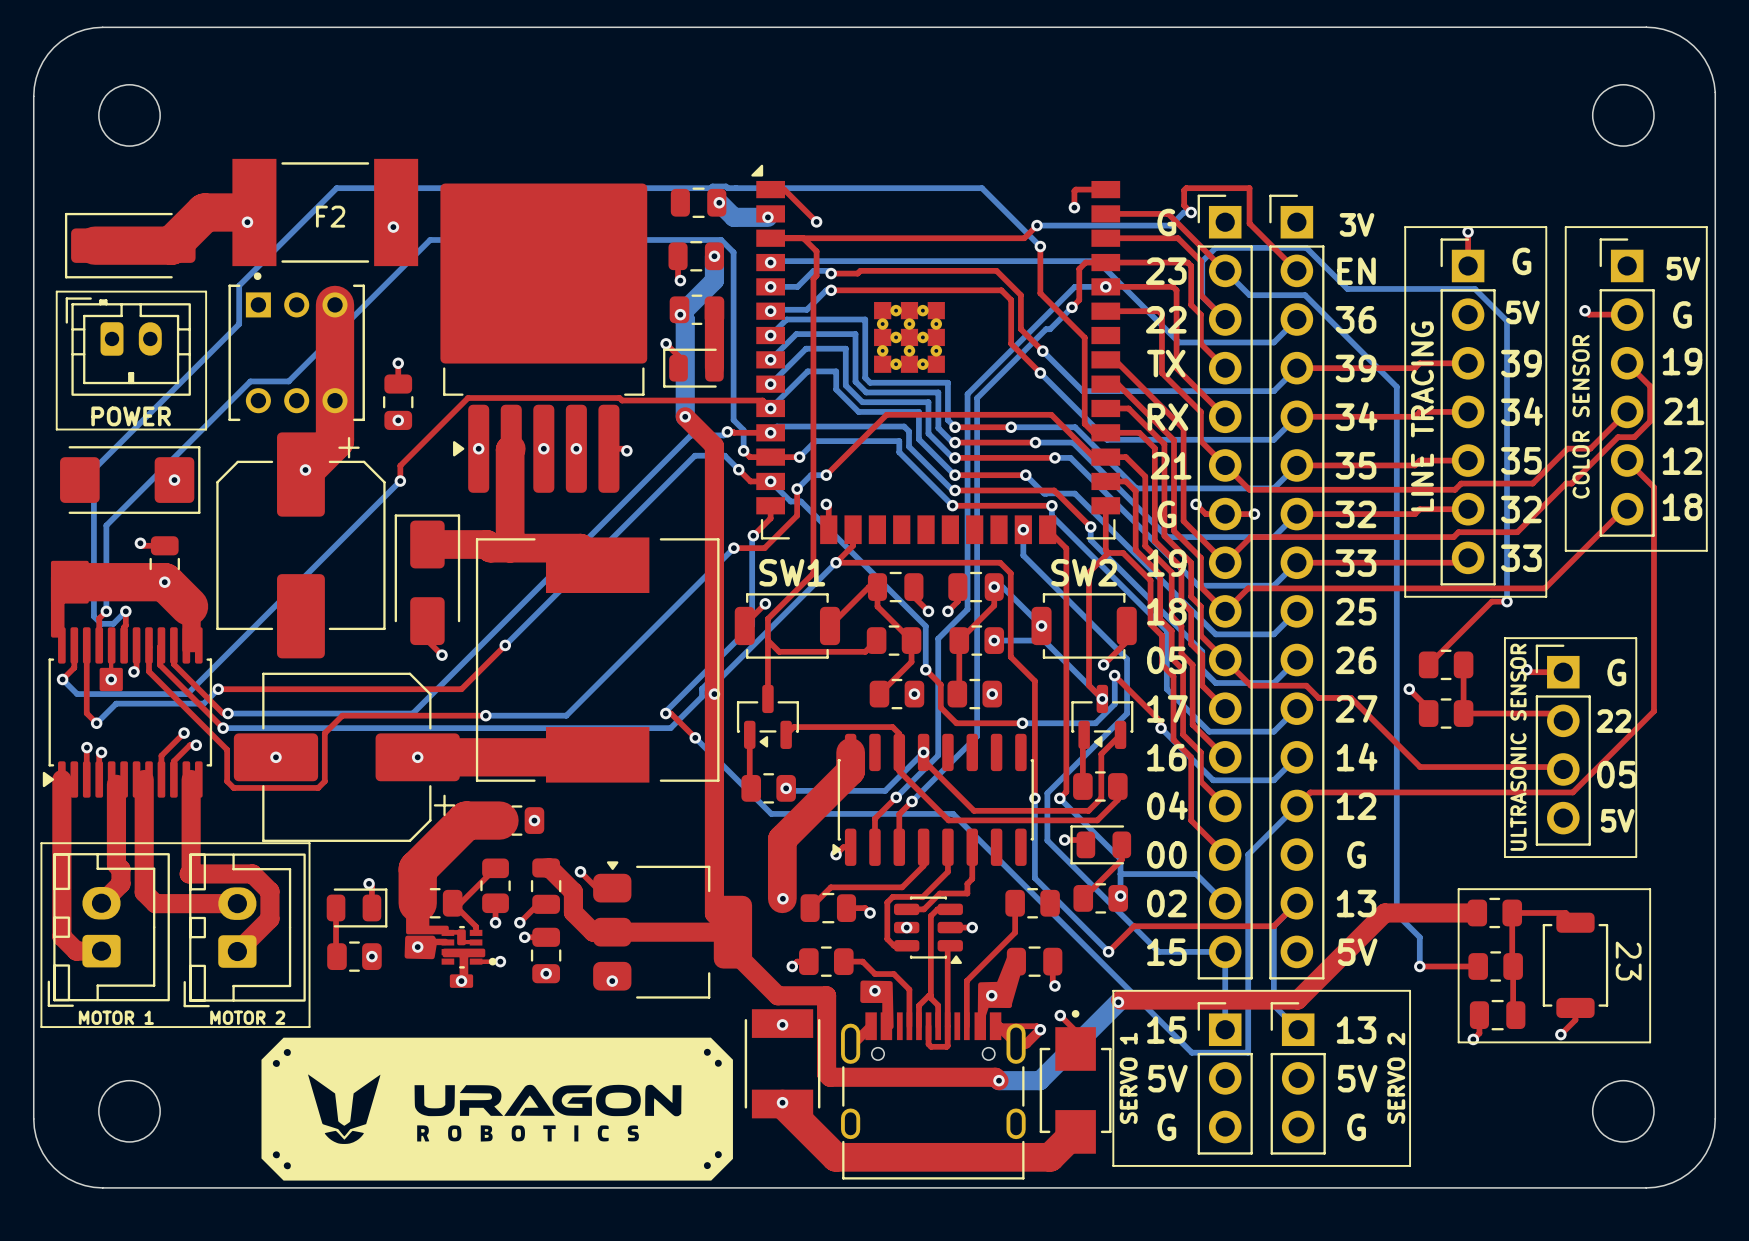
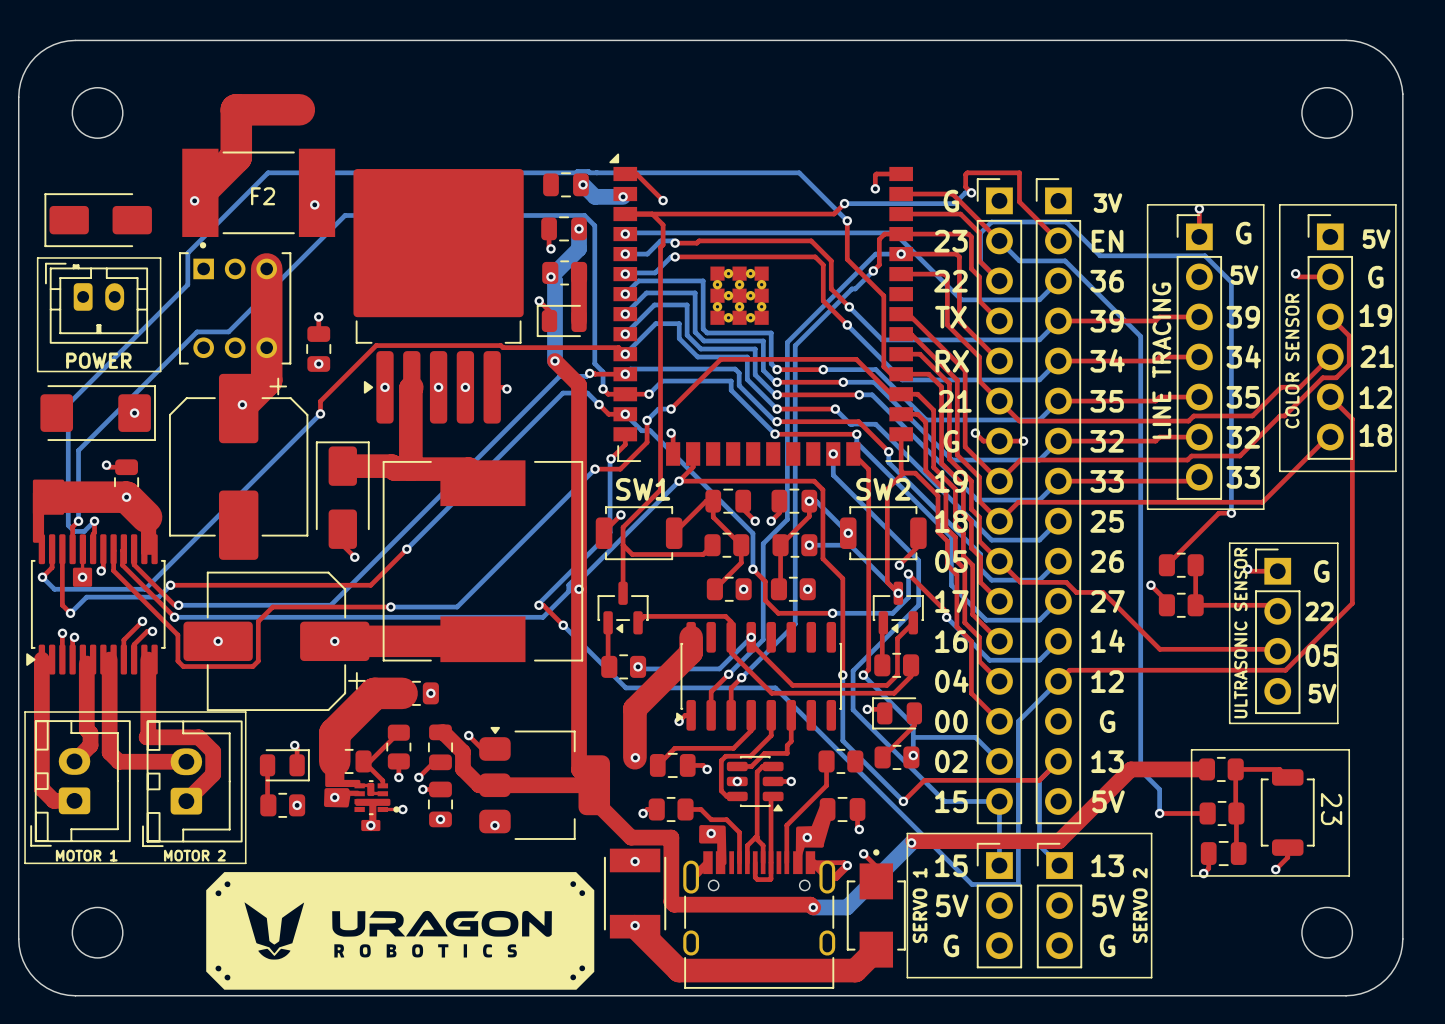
top track: (254, 212) (204, 212) (171, 245) (95, 245) -> (200, 192) (236, 156) (236, 109) (299, 109)

